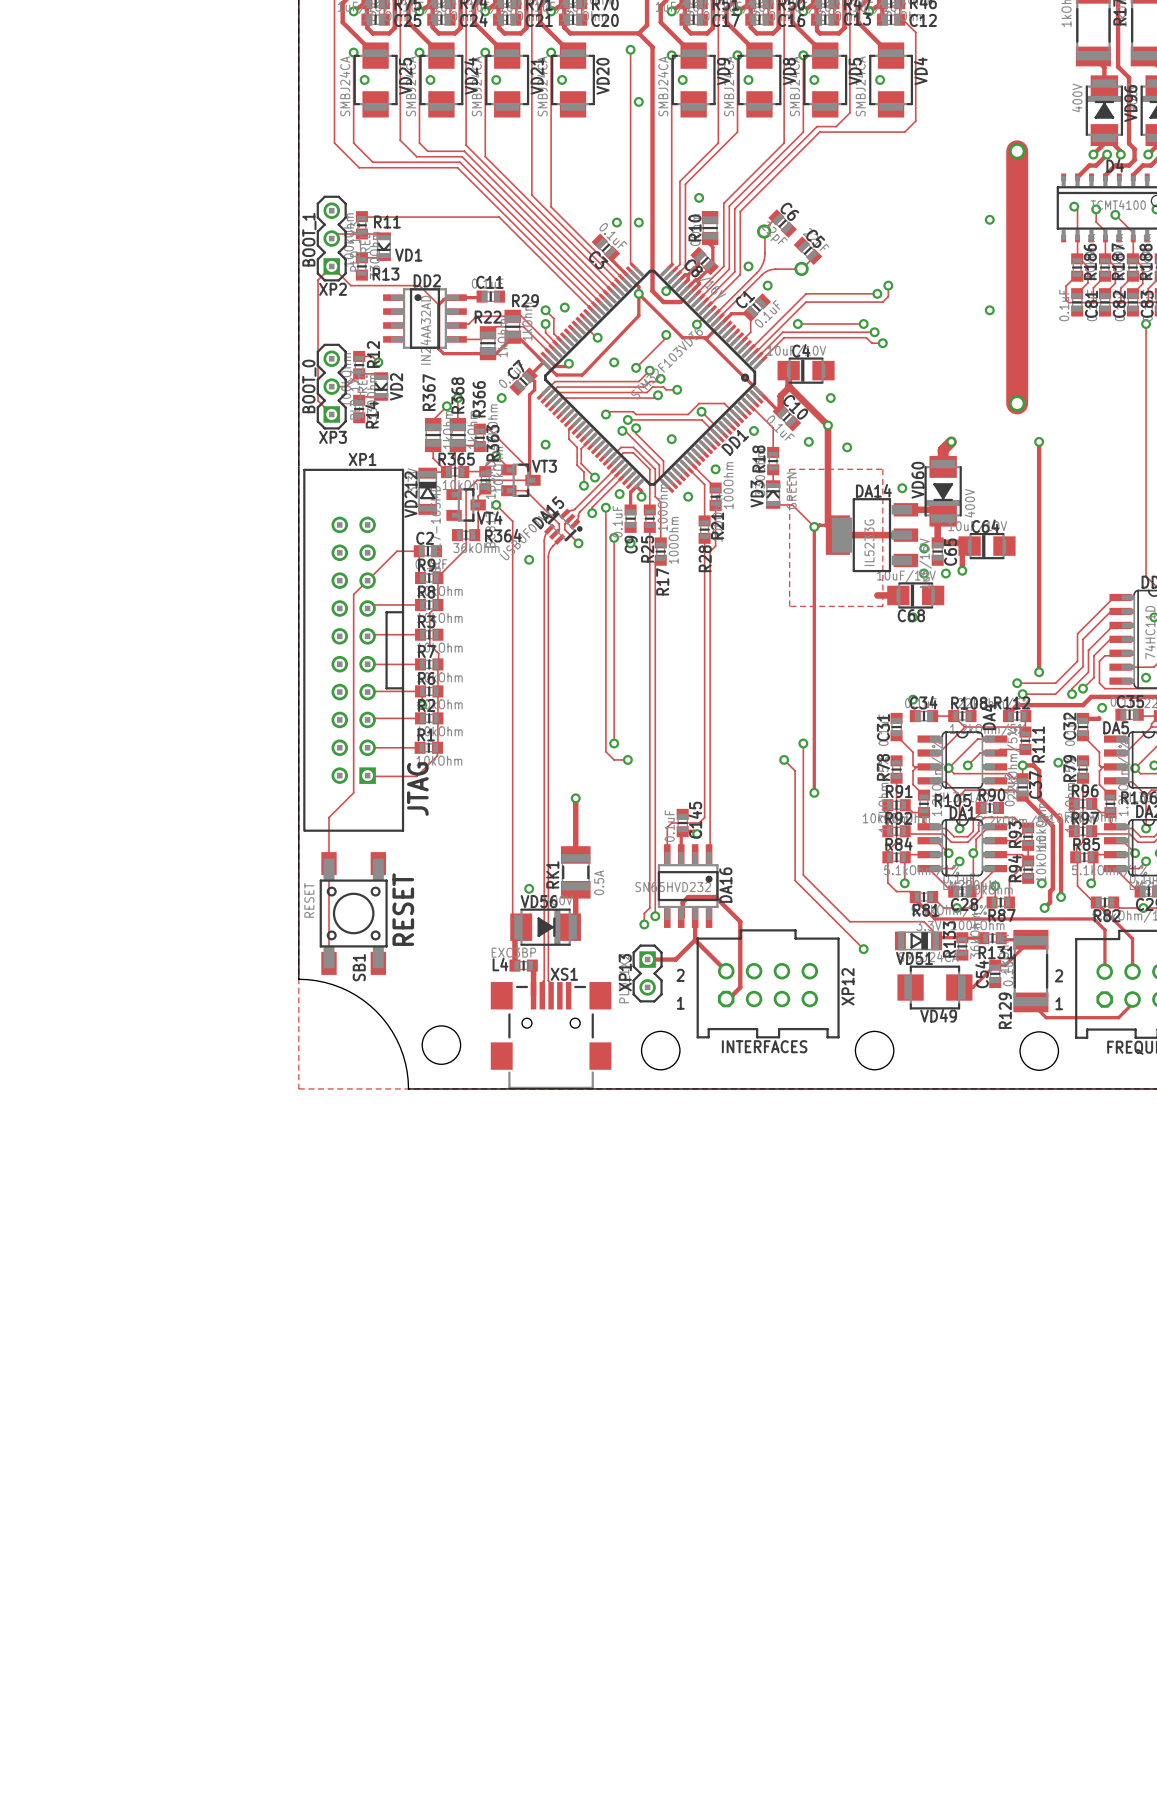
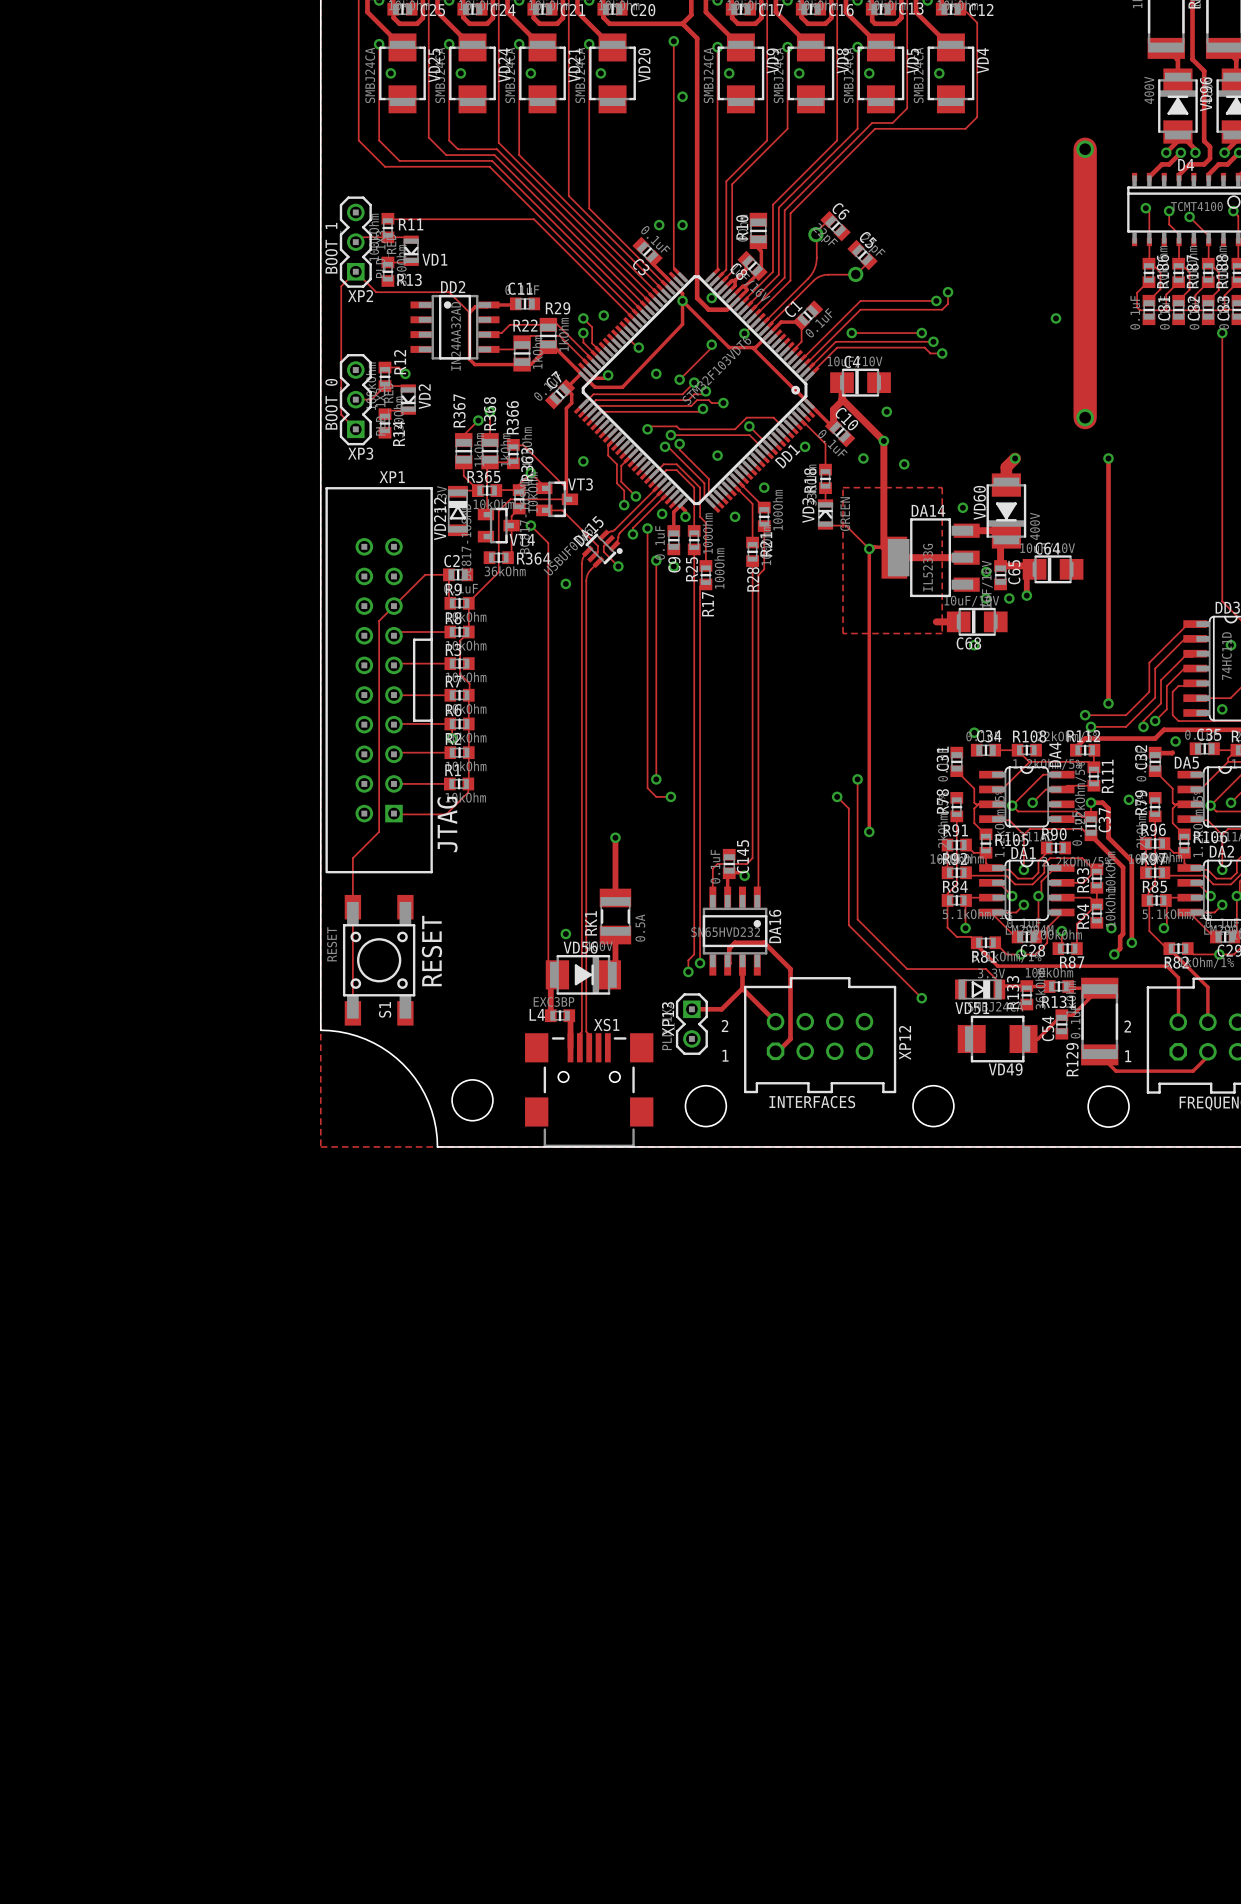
via: (699, 197) -> none
via: (989, 219) -> none
via: (748, 266) -> none
via: (767, 285) -> none
via: (501, 398) -> none
SB1 name: SB1 (359, 967) -> S1 (385, 1009)

